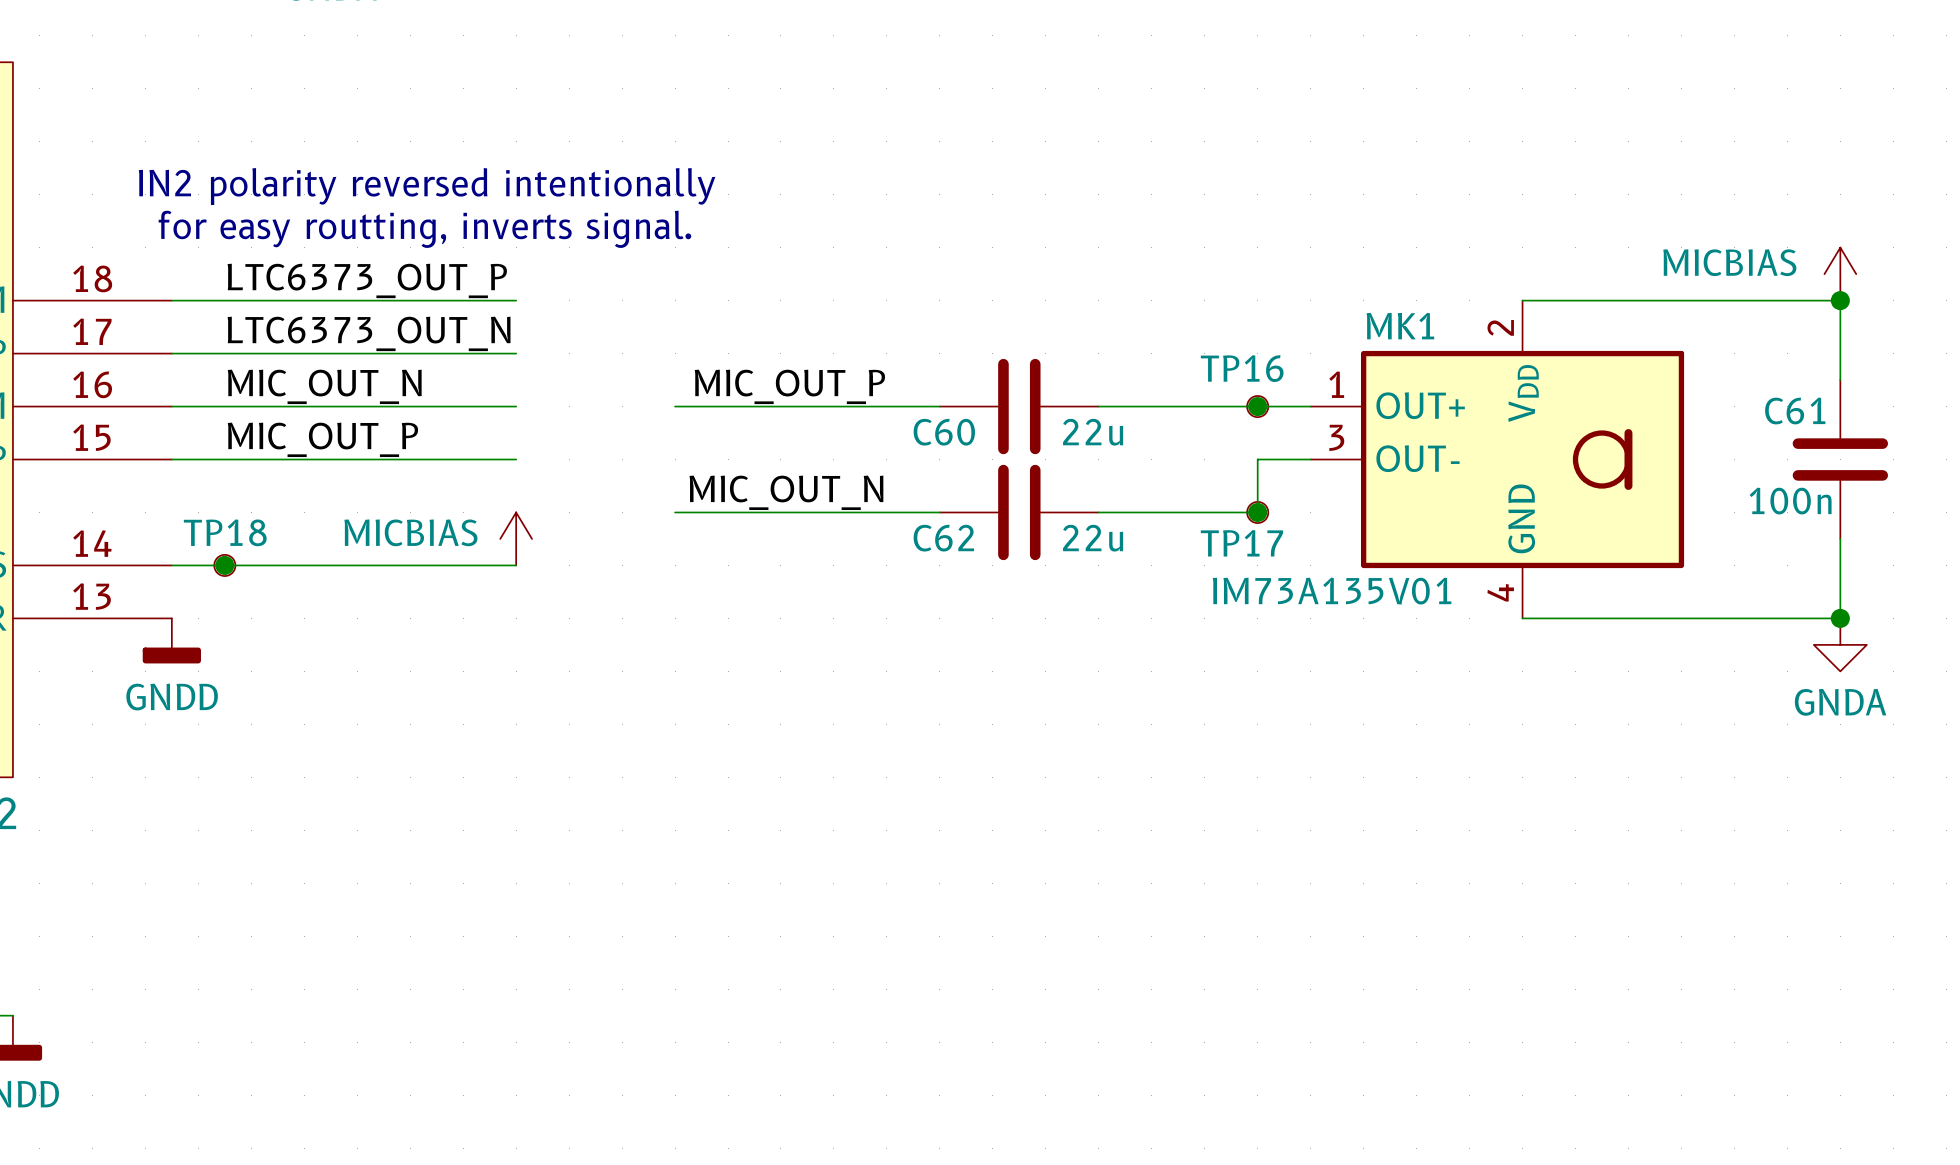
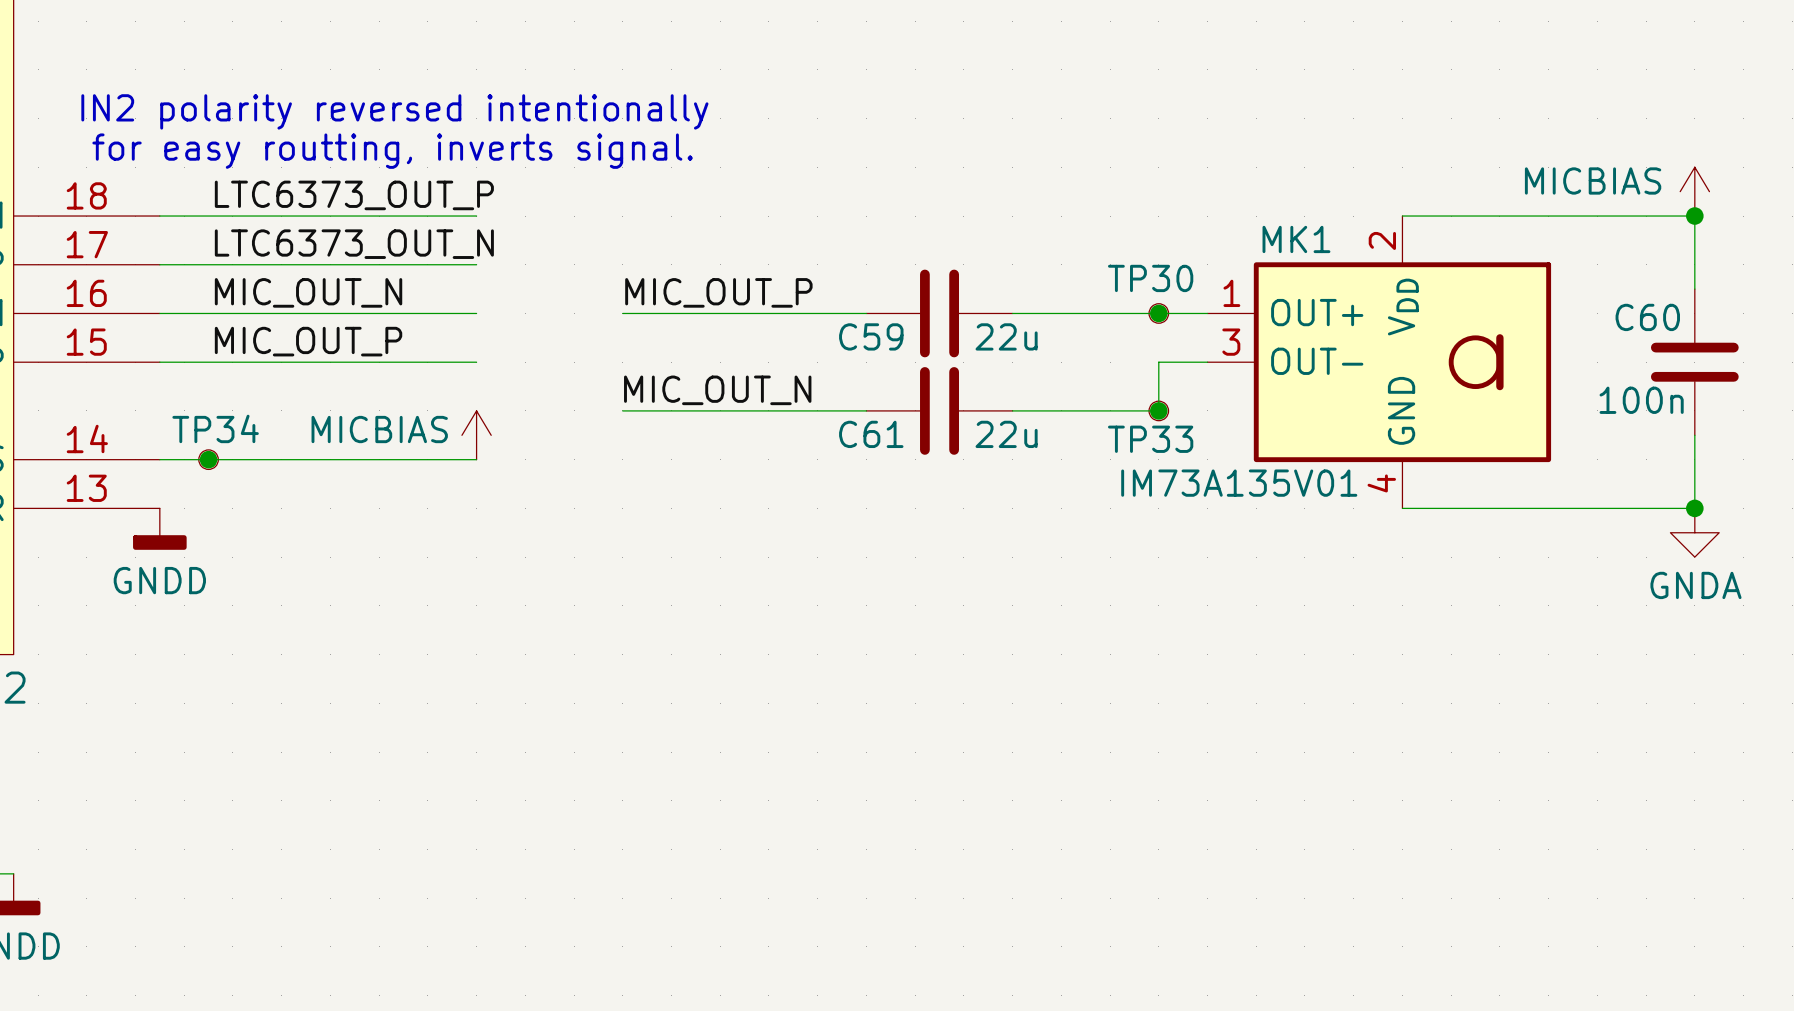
TP16 name: TP16 (1242, 368) -> TP30 (1150, 278)
C61 name: C61 (1795, 411) -> C60 (1647, 317)
C60 name: C60 (944, 432) -> C59 (871, 336)
TP18 name: TP18 (225, 532) -> TP34 (215, 428)
C62 name: C62 (943, 538) -> C61 (871, 434)
TP17 name: TP17 (1241, 543) -> TP33 (1150, 439)

